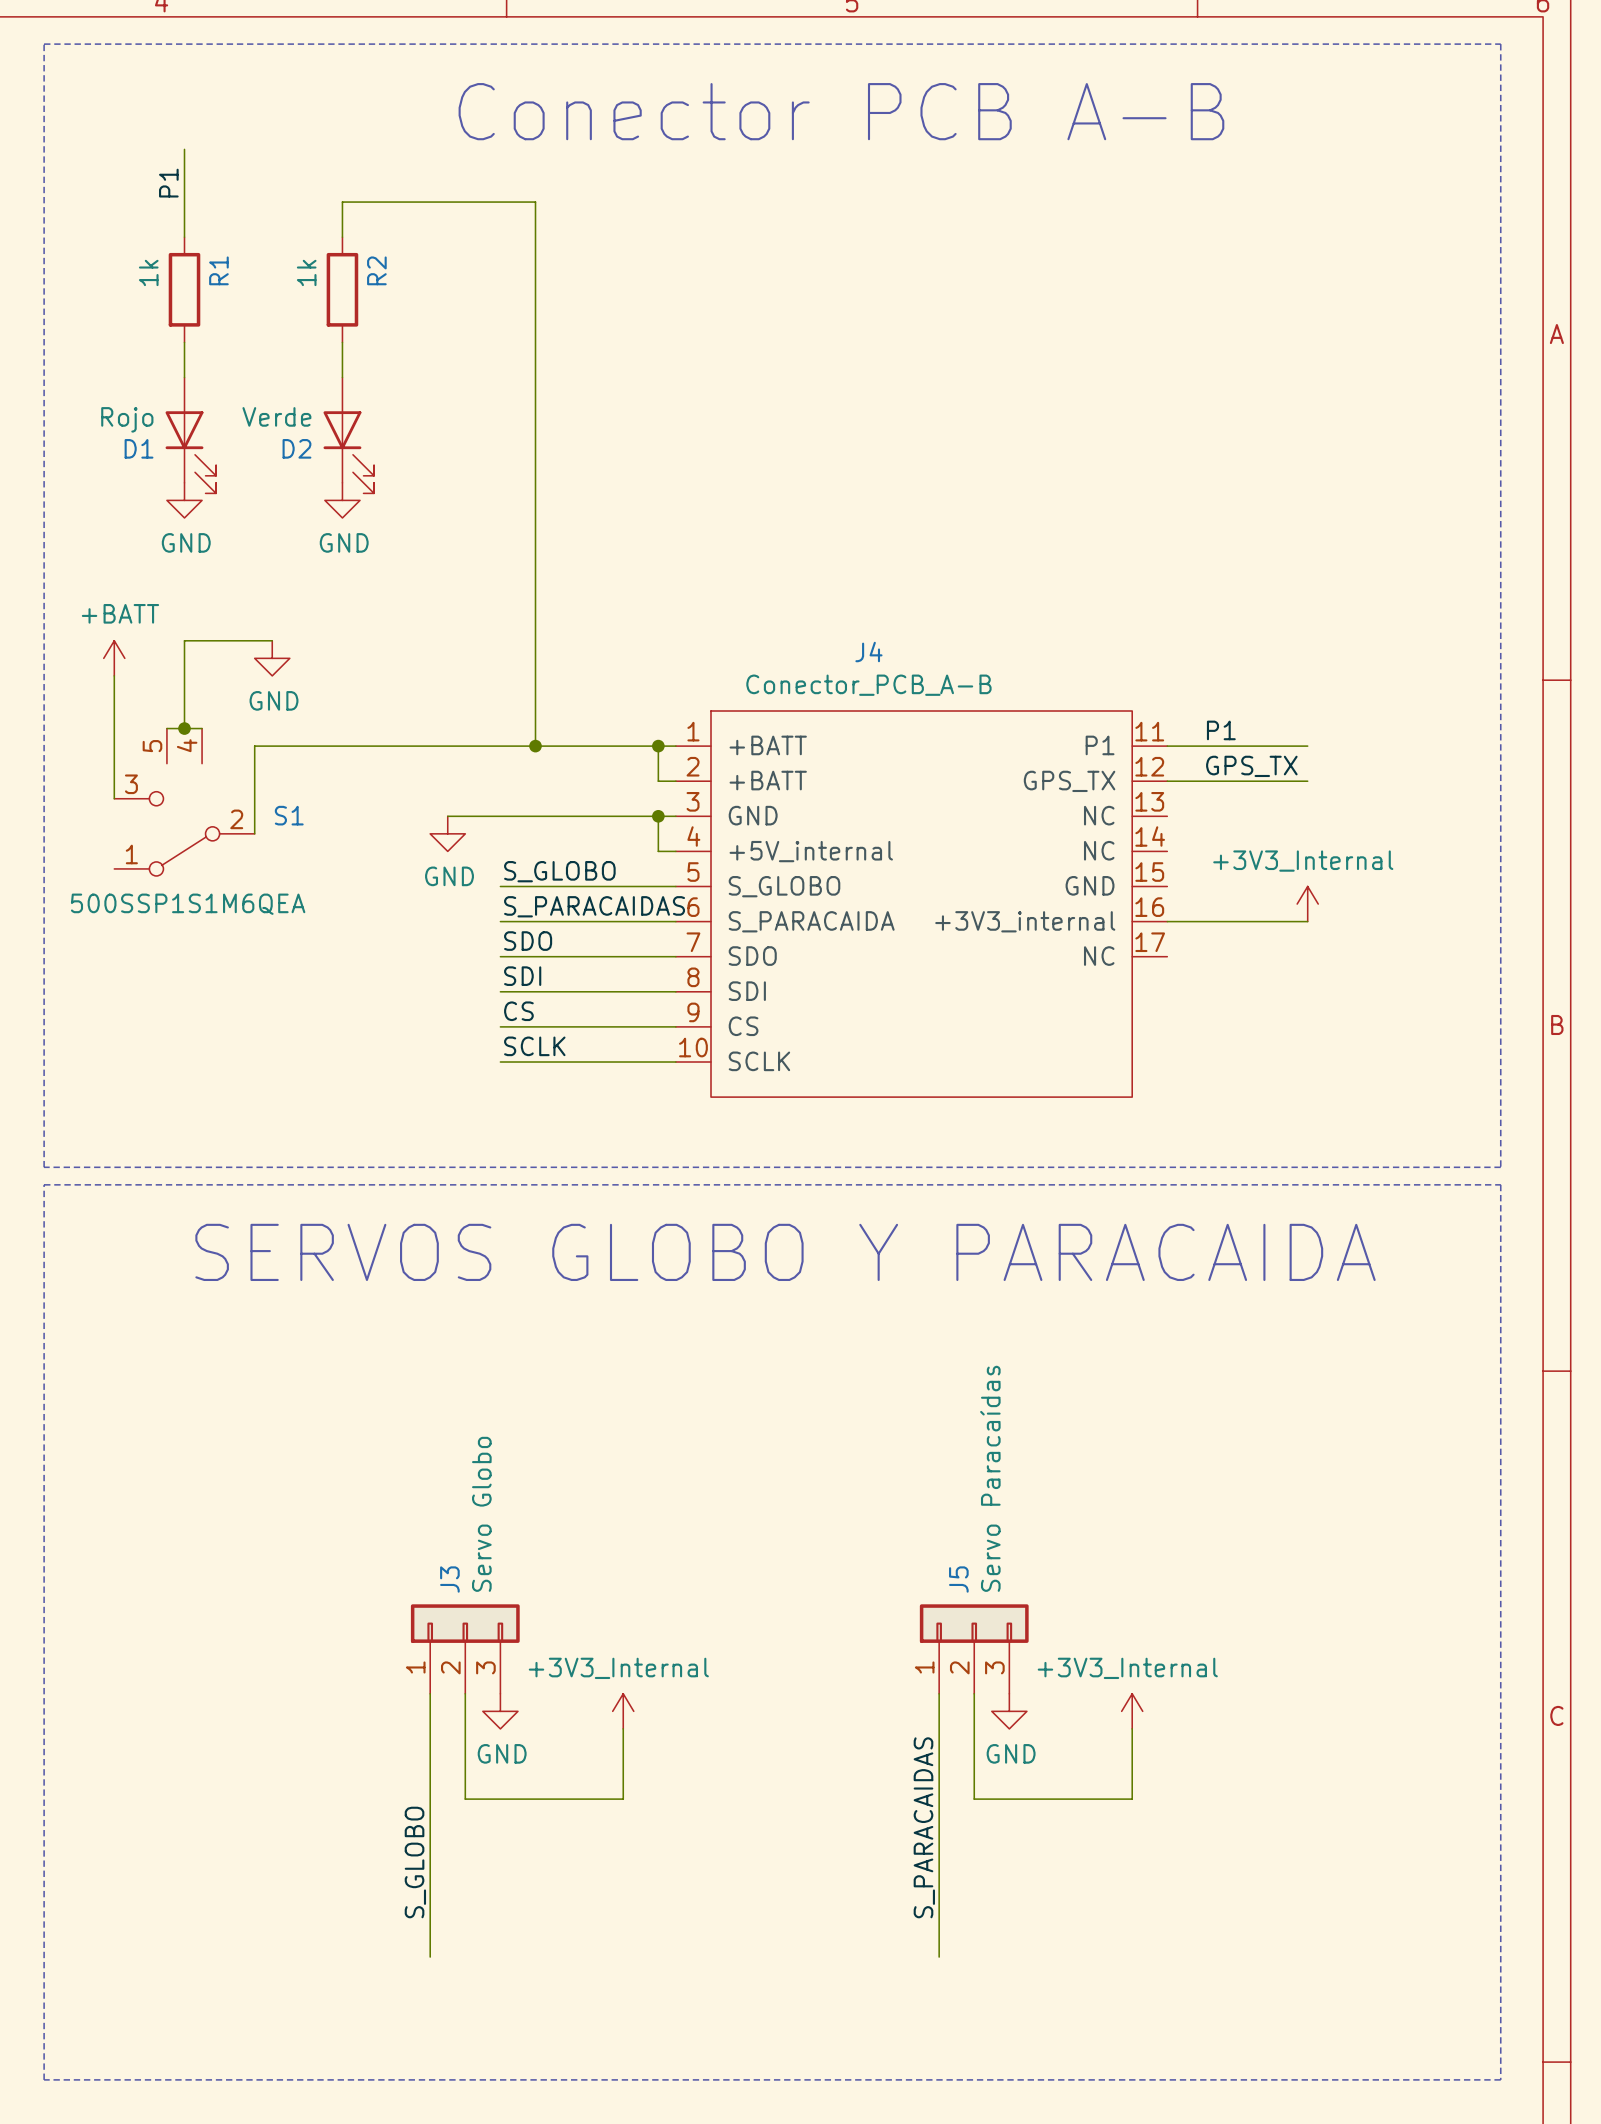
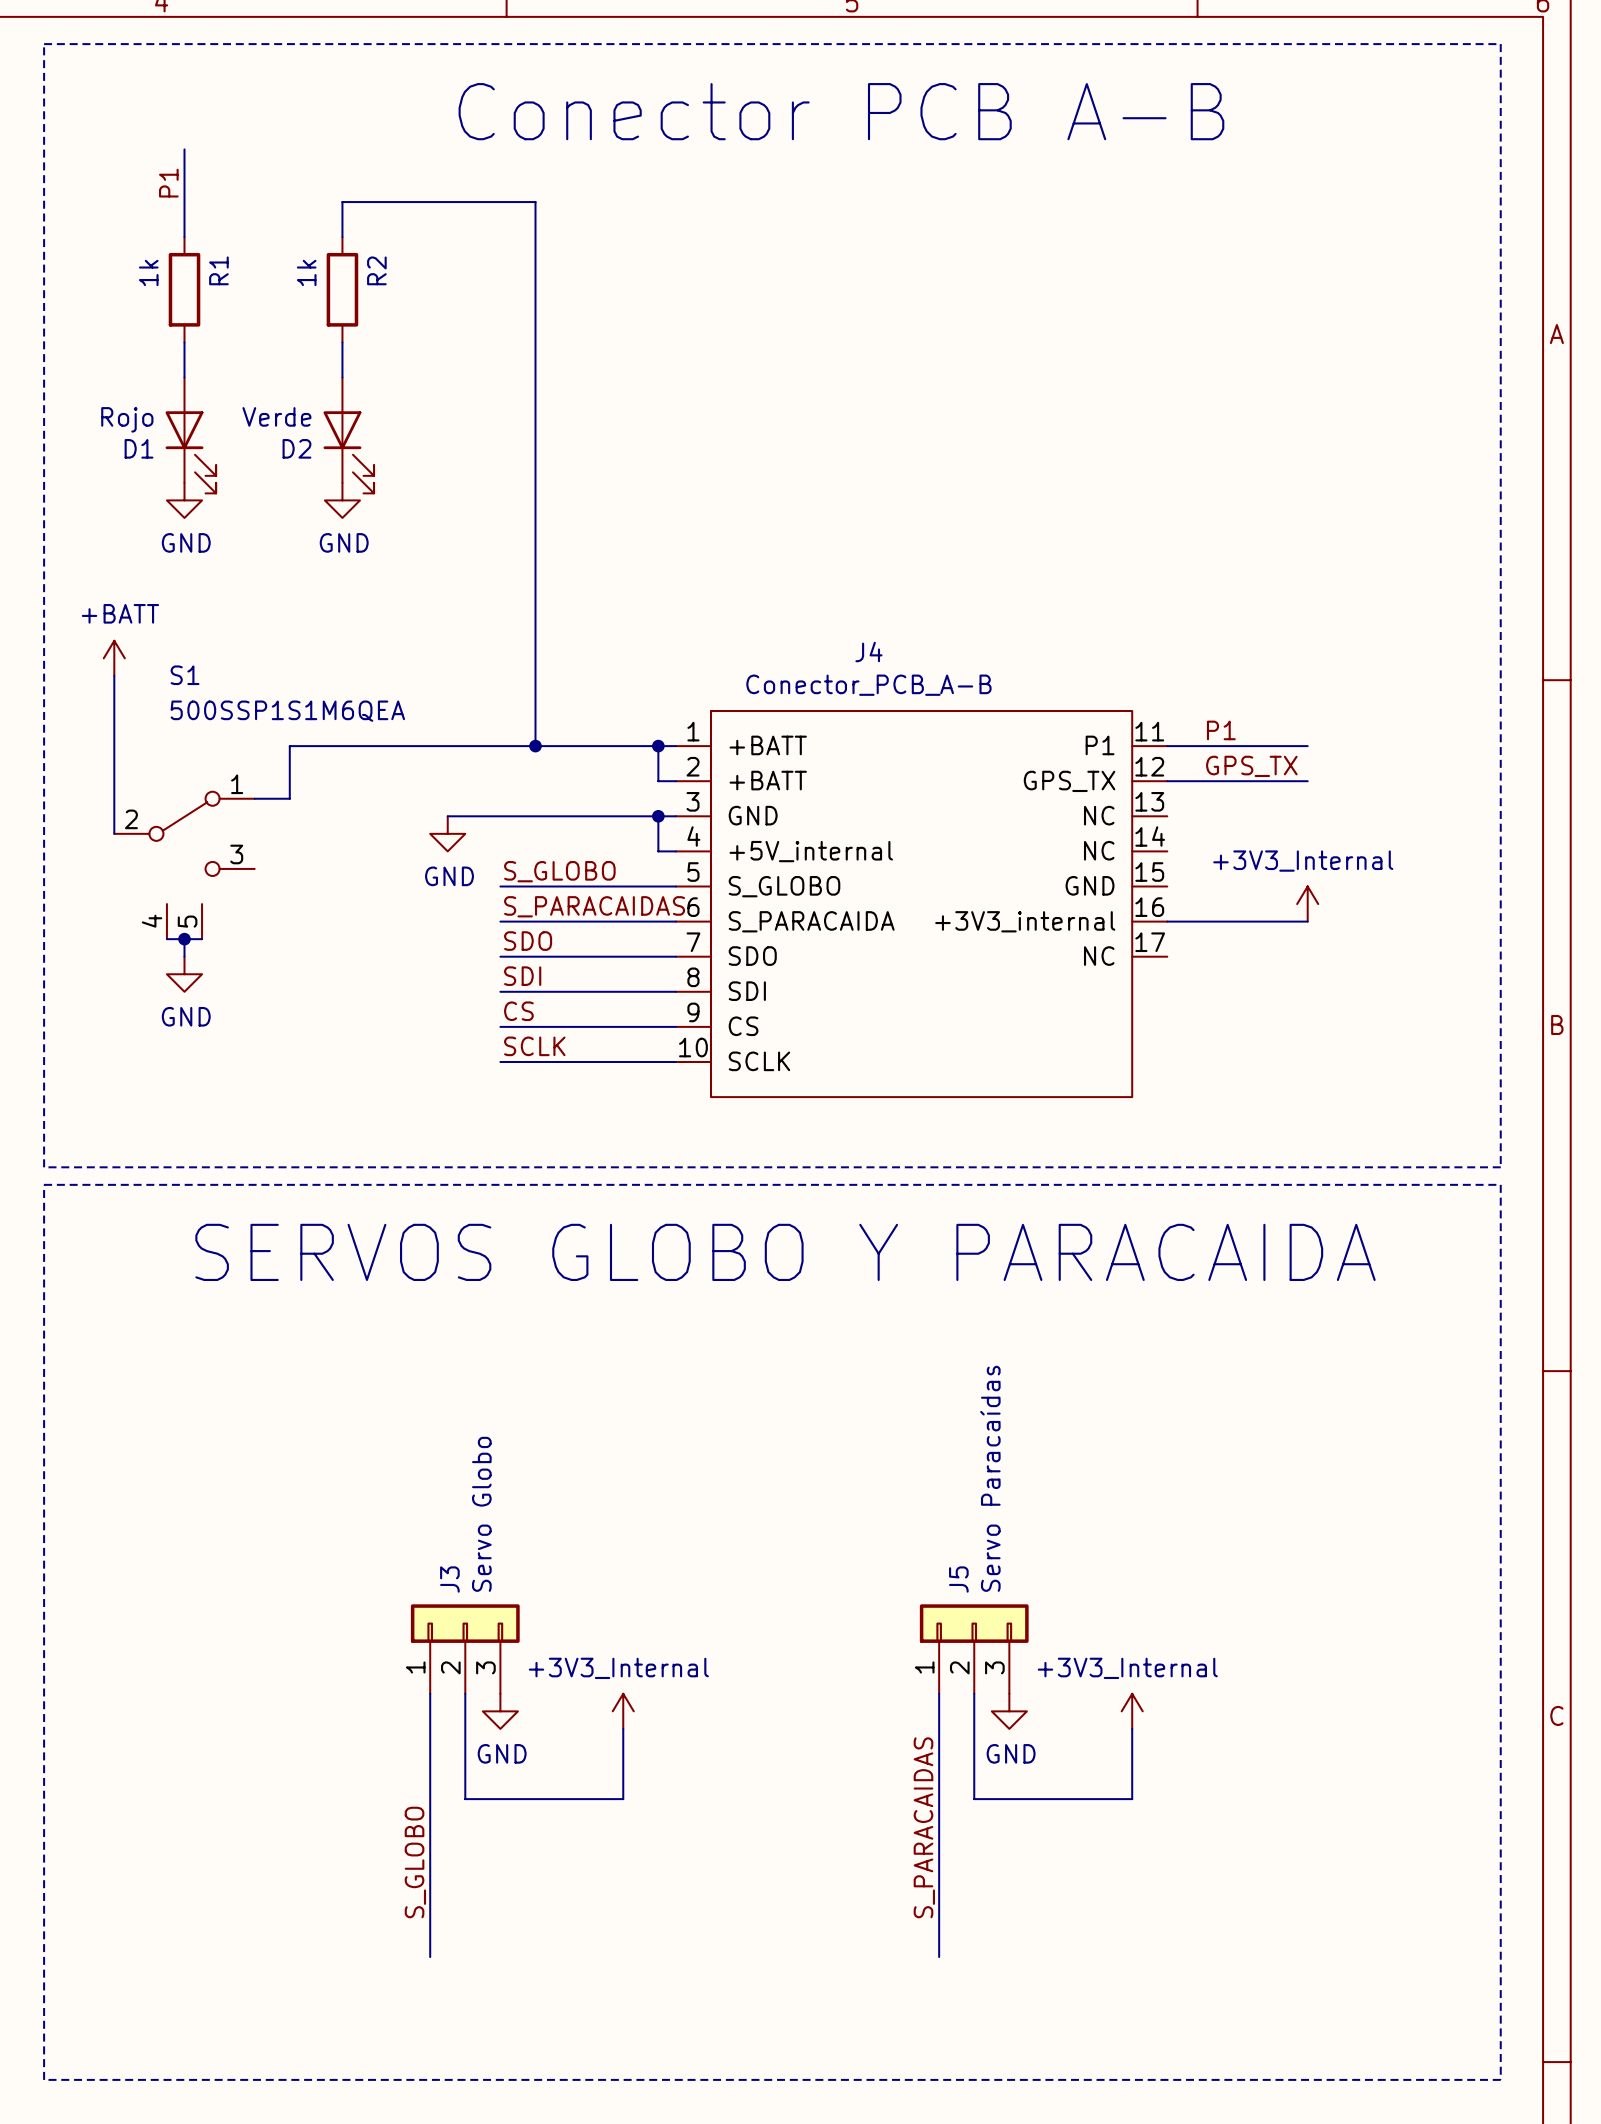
wire: (272, 640) (184, 640) (184, 728) -> none
power symbol position: GND (272, 658) -> GND (184, 974)
wire: (166, 728) (202, 728) -> (166, 939) (202, 939)
junction: (184, 728) -> none
wire: (289, 746) (254, 746) (254, 833) -> (289, 746) (289, 798) (254, 798)
wire: none -> (114, 798) (114, 833)
S1 name position: S1 (289, 815) -> S1 (185, 675)
S1 rotation: 0° (184, 833) -> 180° (184, 833)
S1 value position: 500SSP1S1M6QEA (188, 904) -> 500SSP1S1M6QEA (287, 711)
wire: none -> (184, 939) (184, 956)
junction: none -> (184, 939)

